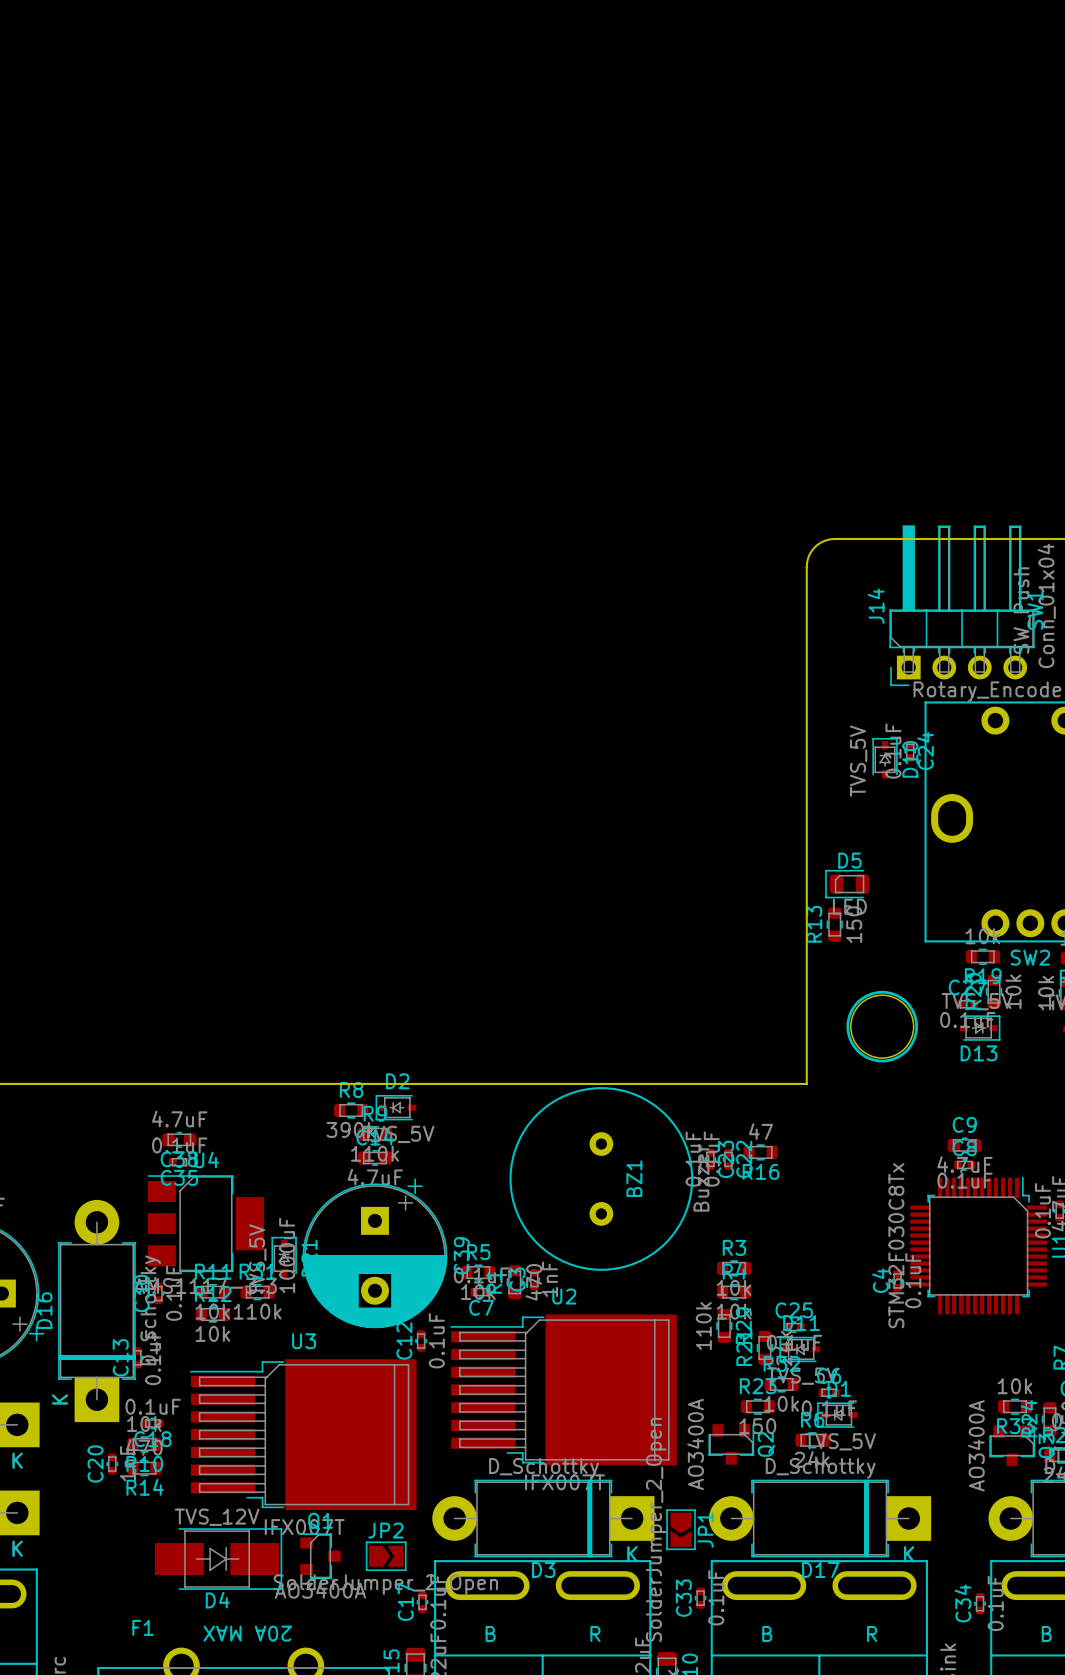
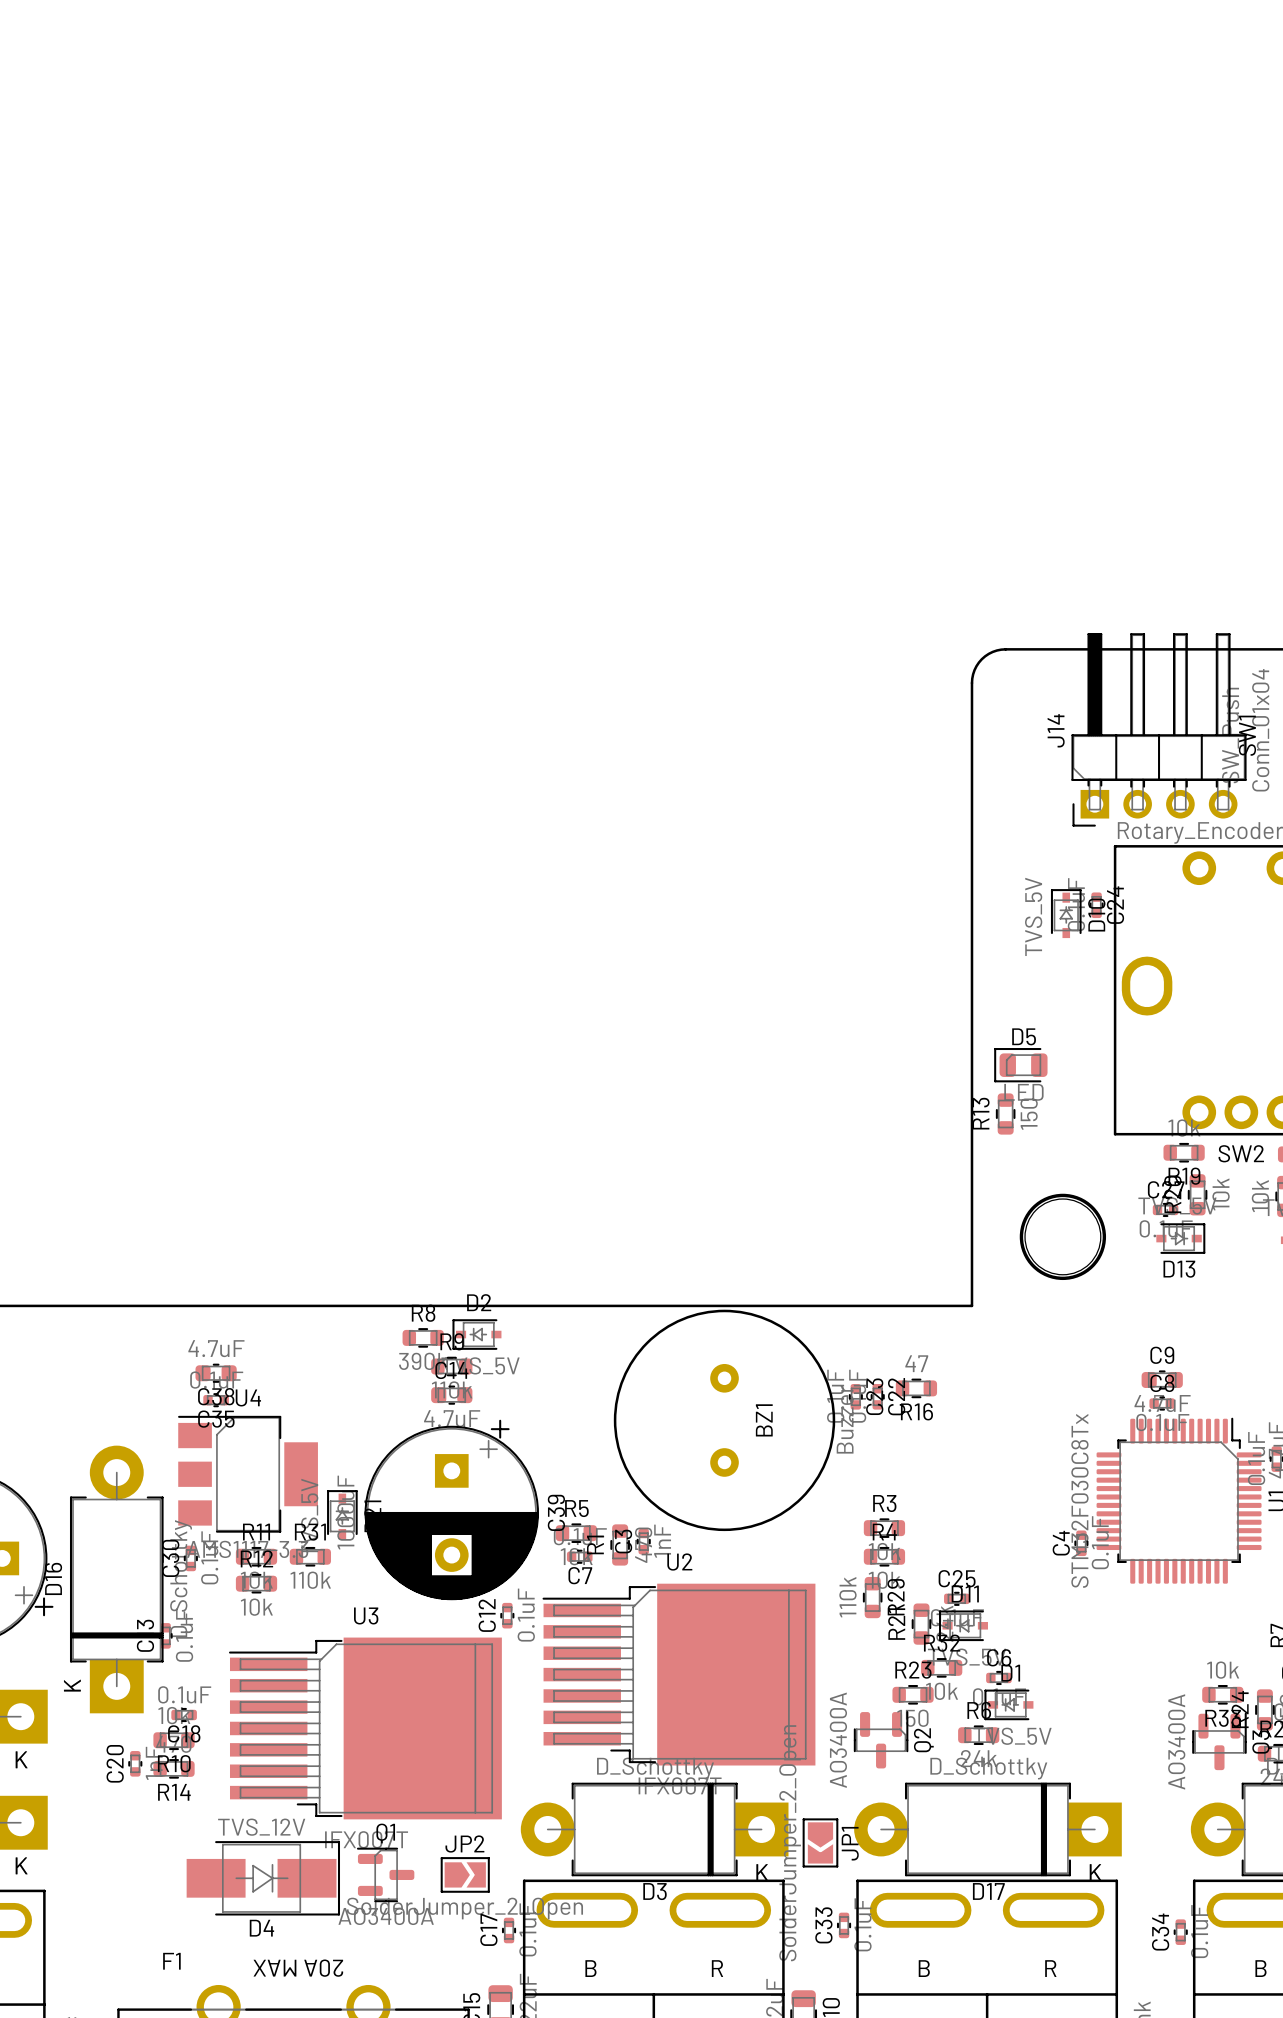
Q2 footprint: [708, 1424, 755, 1465] -> [853, 1711, 909, 1769]
Q3 footprint: [989, 1425, 1036, 1467] -> [1192, 1712, 1247, 1771]
Q1 footprint: [300, 1533, 341, 1580] -> [356, 1847, 415, 1903]

